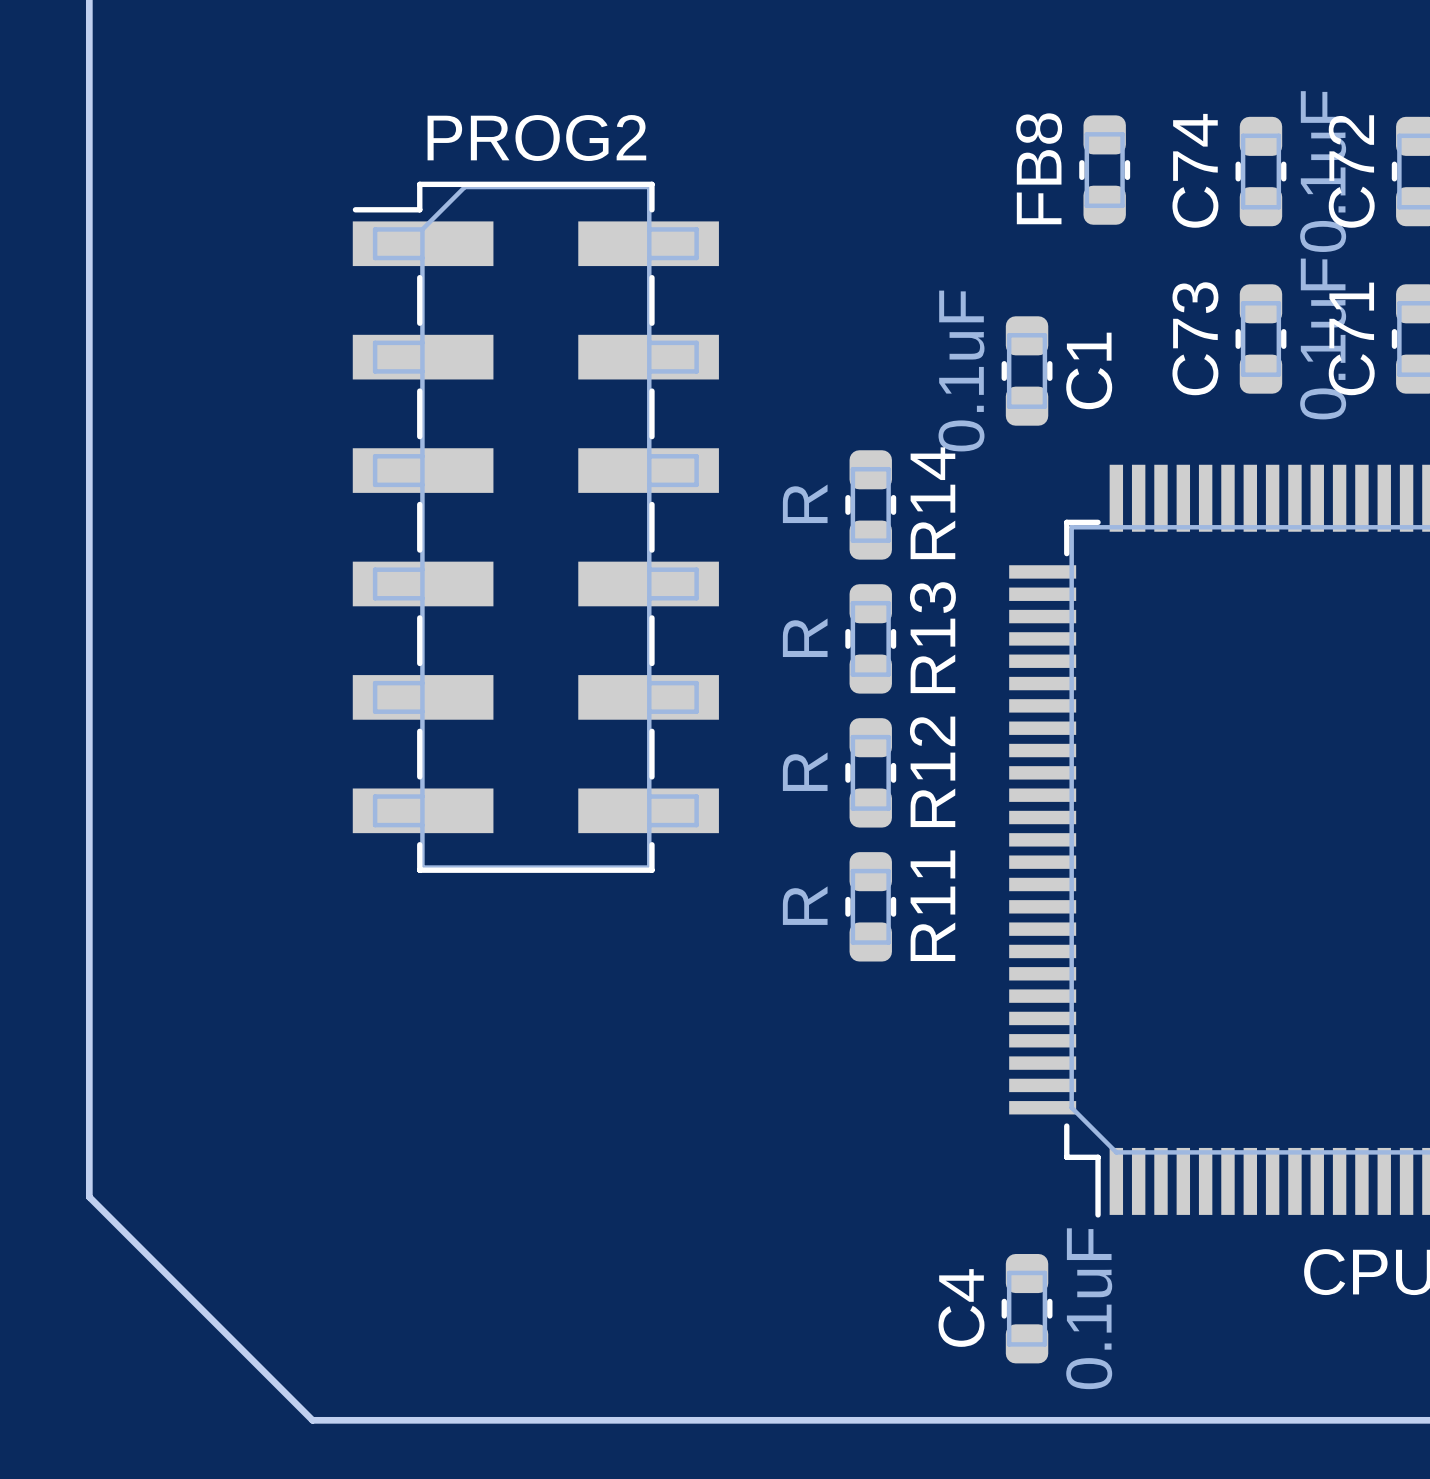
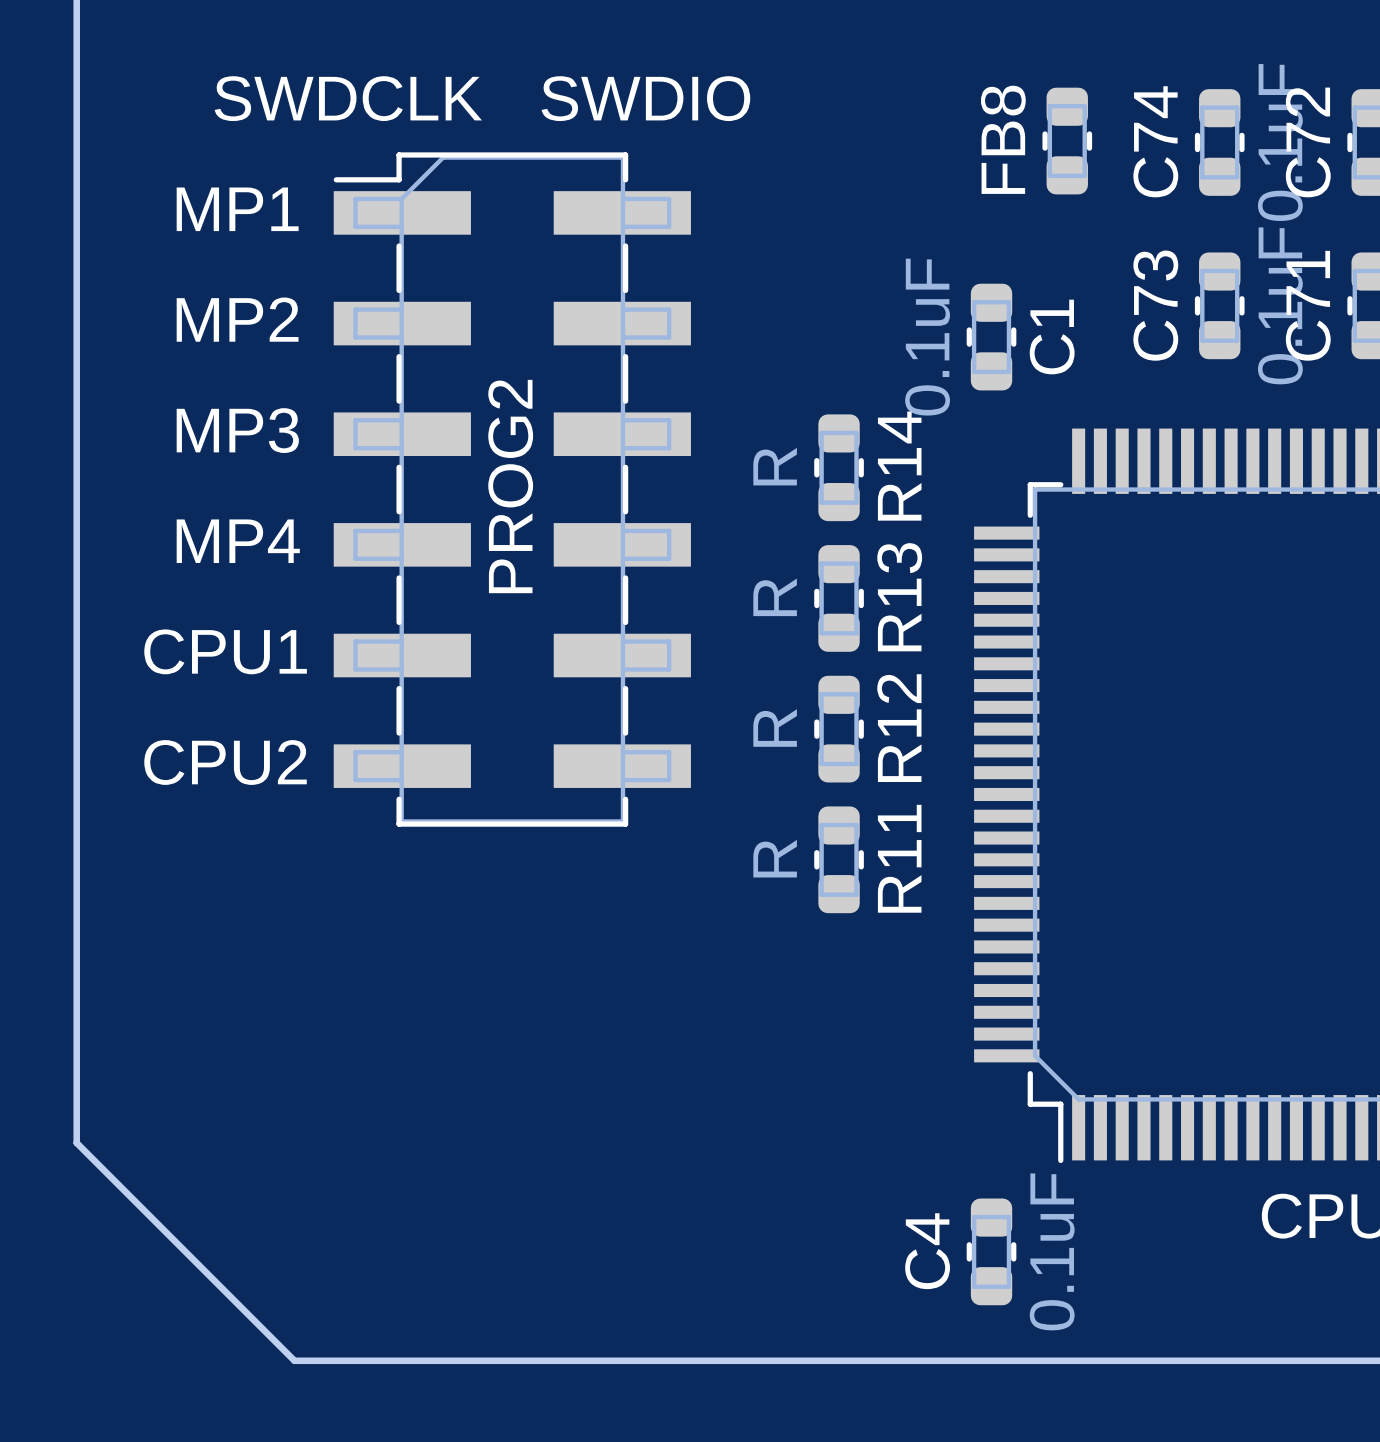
text: none -> SWDCLK (348, 98)
text: none -> SWDIO (645, 98)
PROG2 name rotation: 0° (536, 138) -> 90° counterclockwise (510, 486)
PROG2 name position: PROG2 (536, 138) -> PROG2 (510, 486)
text: none -> MP1 (237, 209)
text: none -> MP2 (237, 319)
text: none -> MP3 (237, 430)
text: none -> MP4 (238, 541)
text: none -> CPU1 (225, 651)
text: none -> CPU2 (225, 762)

